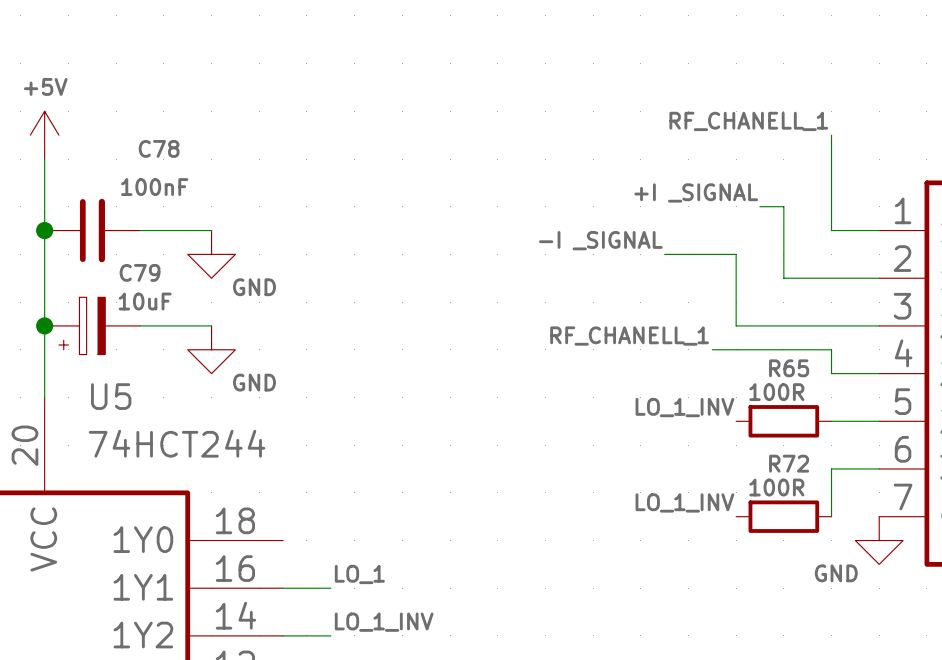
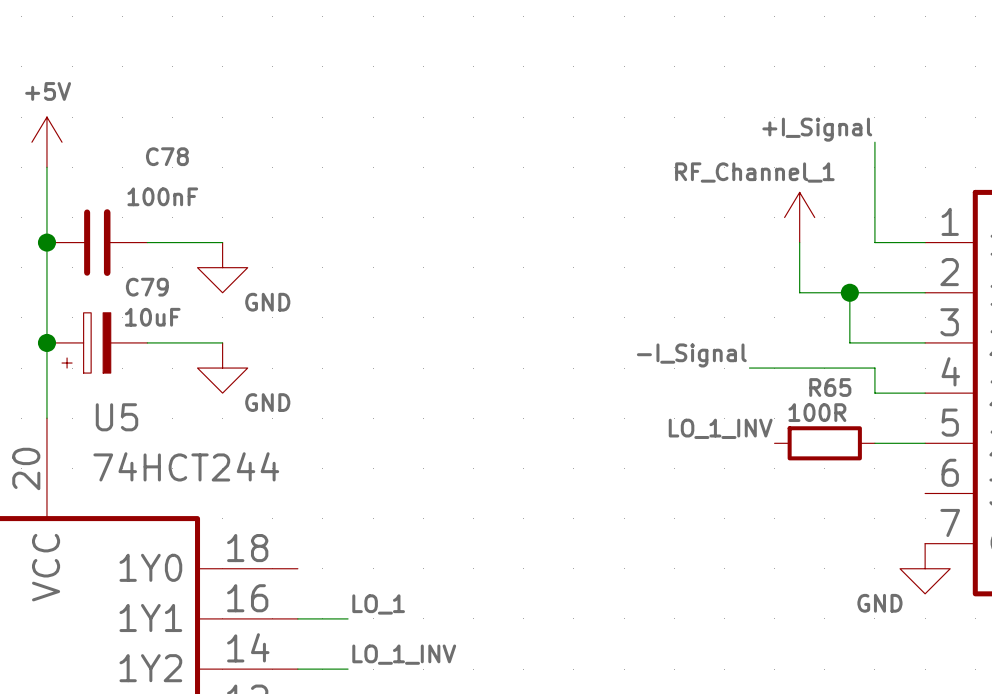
label: RF_CHANELL_1 (748, 121) -> +I_Signal (817, 129)
label: +I _SIGNAL (696, 192) -> none
wire: (759, 206) (783, 206) (783, 278) -> (799, 242) (799, 292) (824, 292)
power symbol: none -> RF_Channel_1 (799, 217)
label: -I _SIGNAL (600, 240) -> none
wire: (664, 254) (736, 254) (736, 325) (807, 325) -> (849, 292) (849, 342)
junction: none -> (849, 292)
label: RF_CHANELL_1 (629, 336) -> -I_Signal (691, 355)
wire: (879, 469) (831, 469) (831, 516) -> none
label: LO_1_INV (684, 502) -> none
R72: 100R (783, 516) -> none

